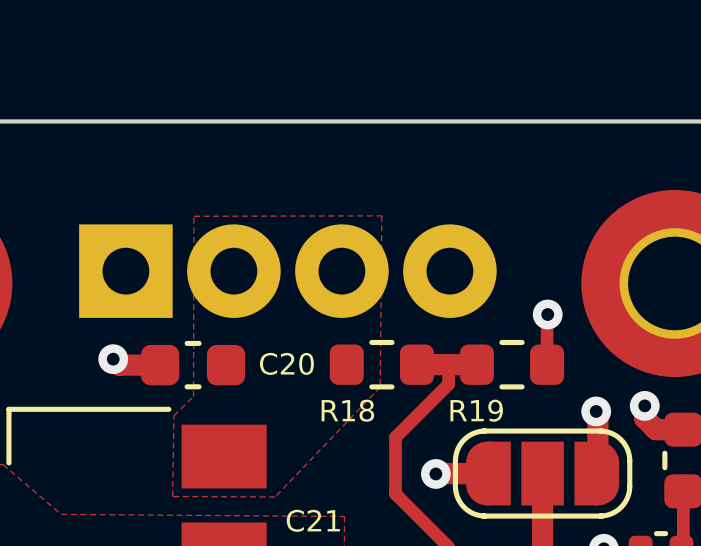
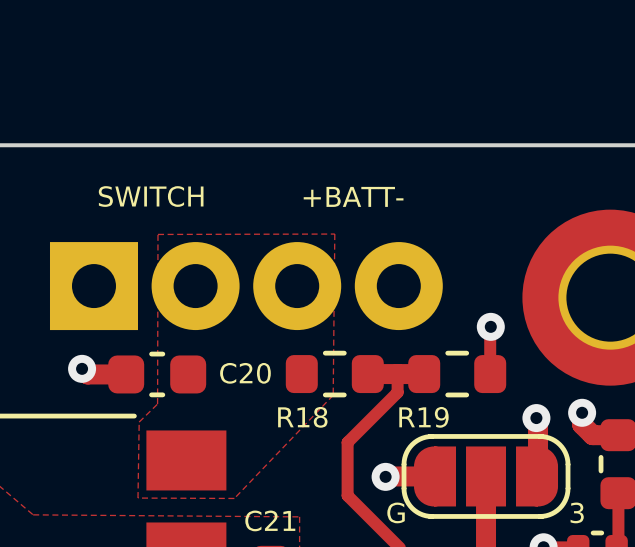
text: none -> SWITCH (151, 196)
text: none -> +BATT- (353, 196)
text: none -> G (396, 512)
text: none -> 3 (577, 512)

